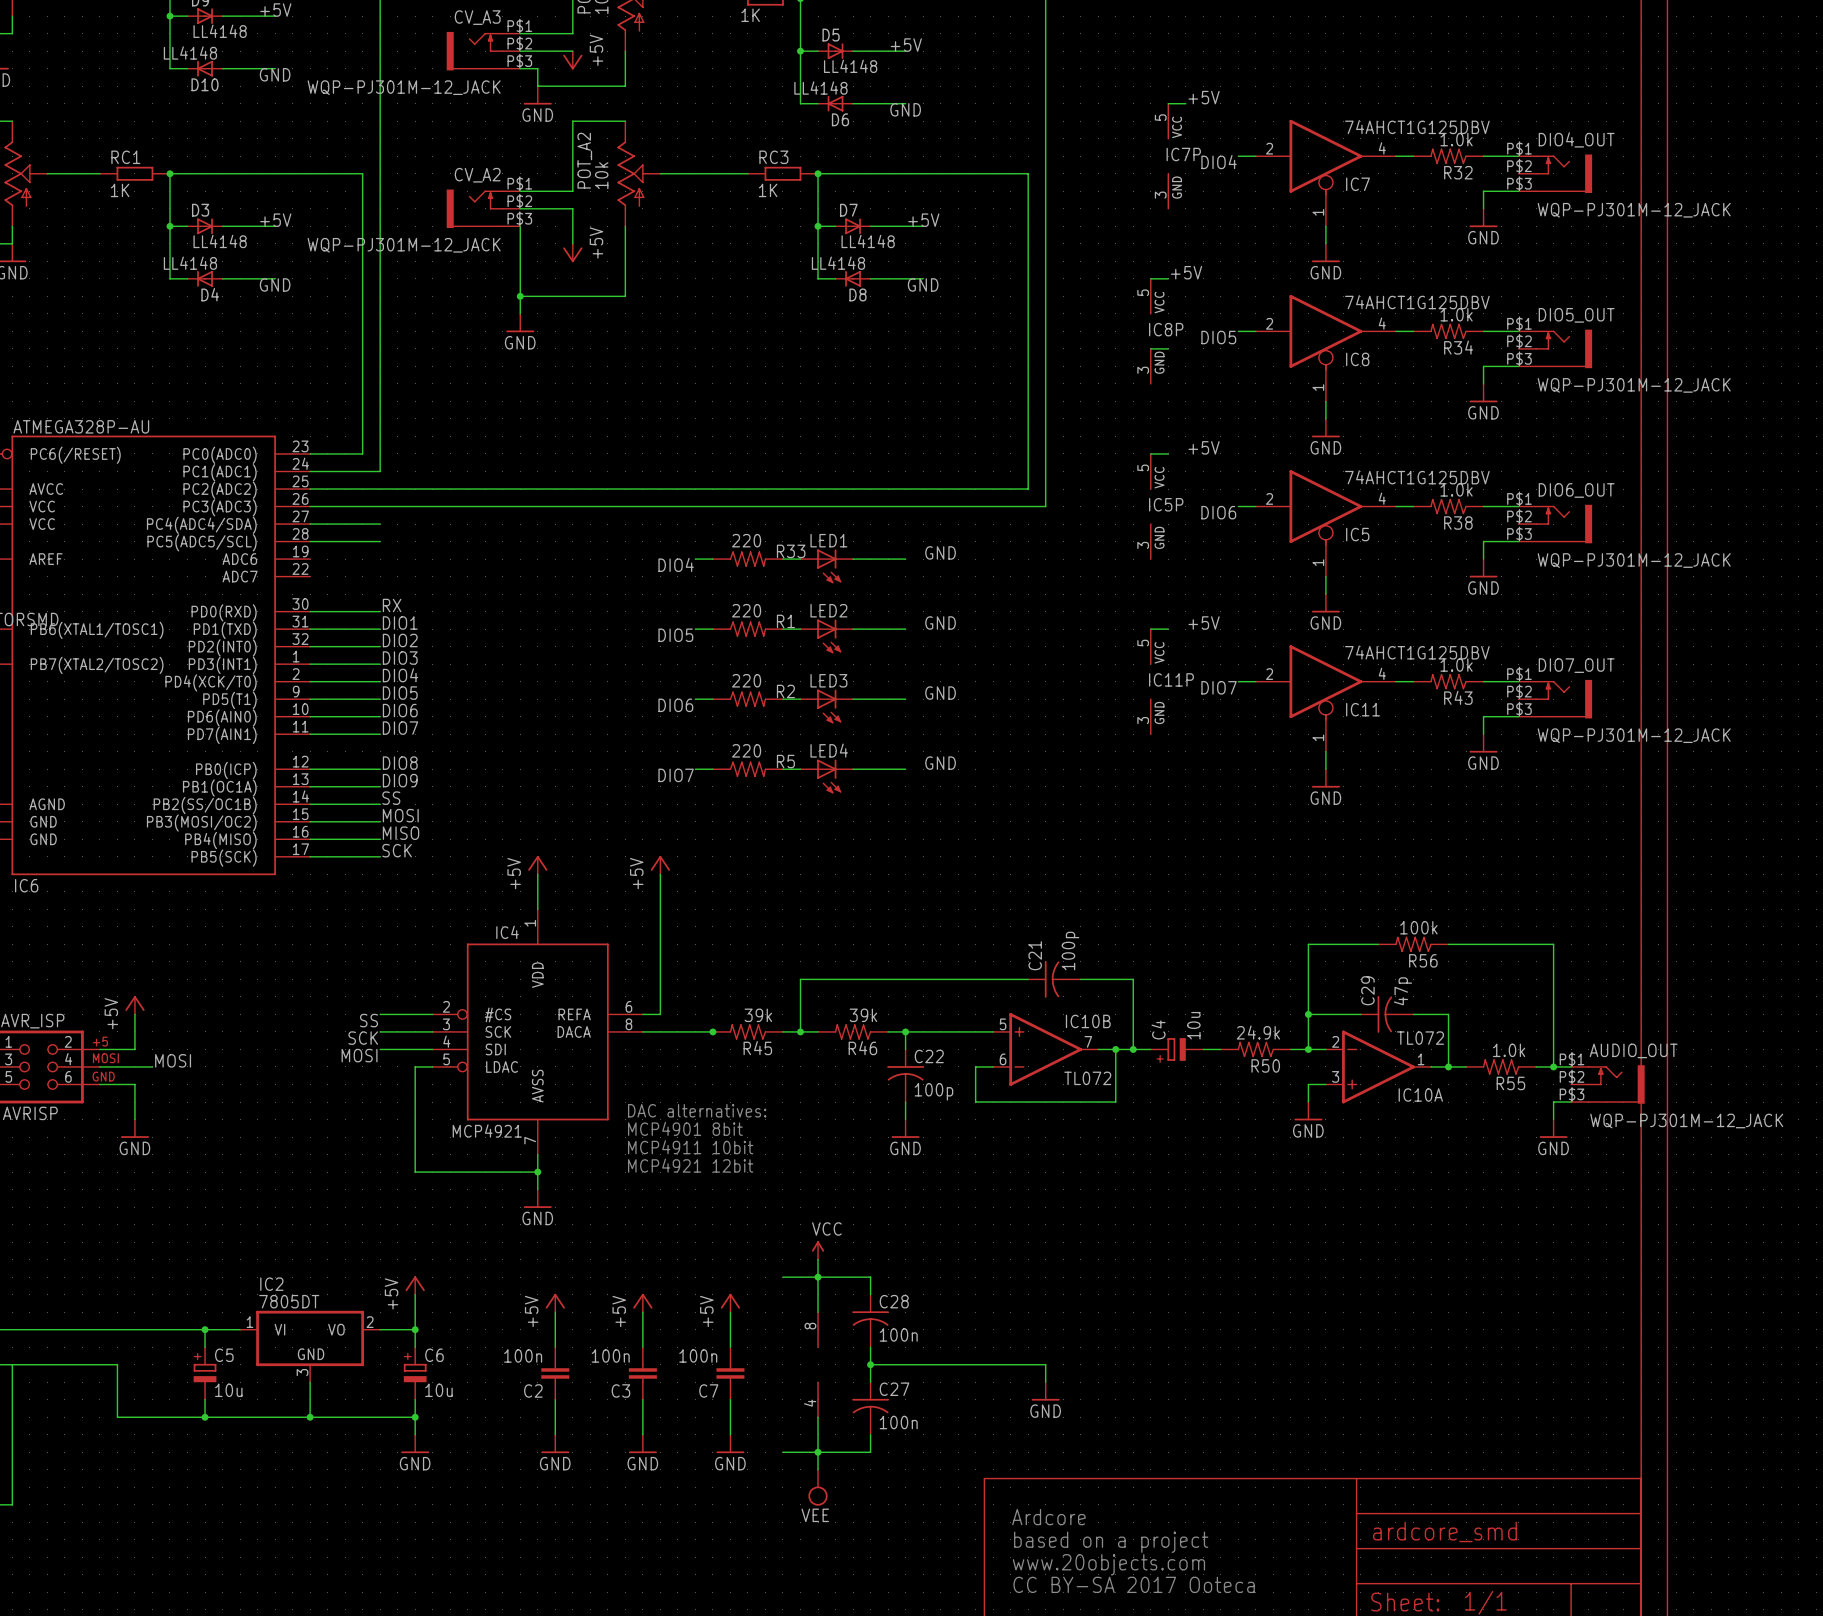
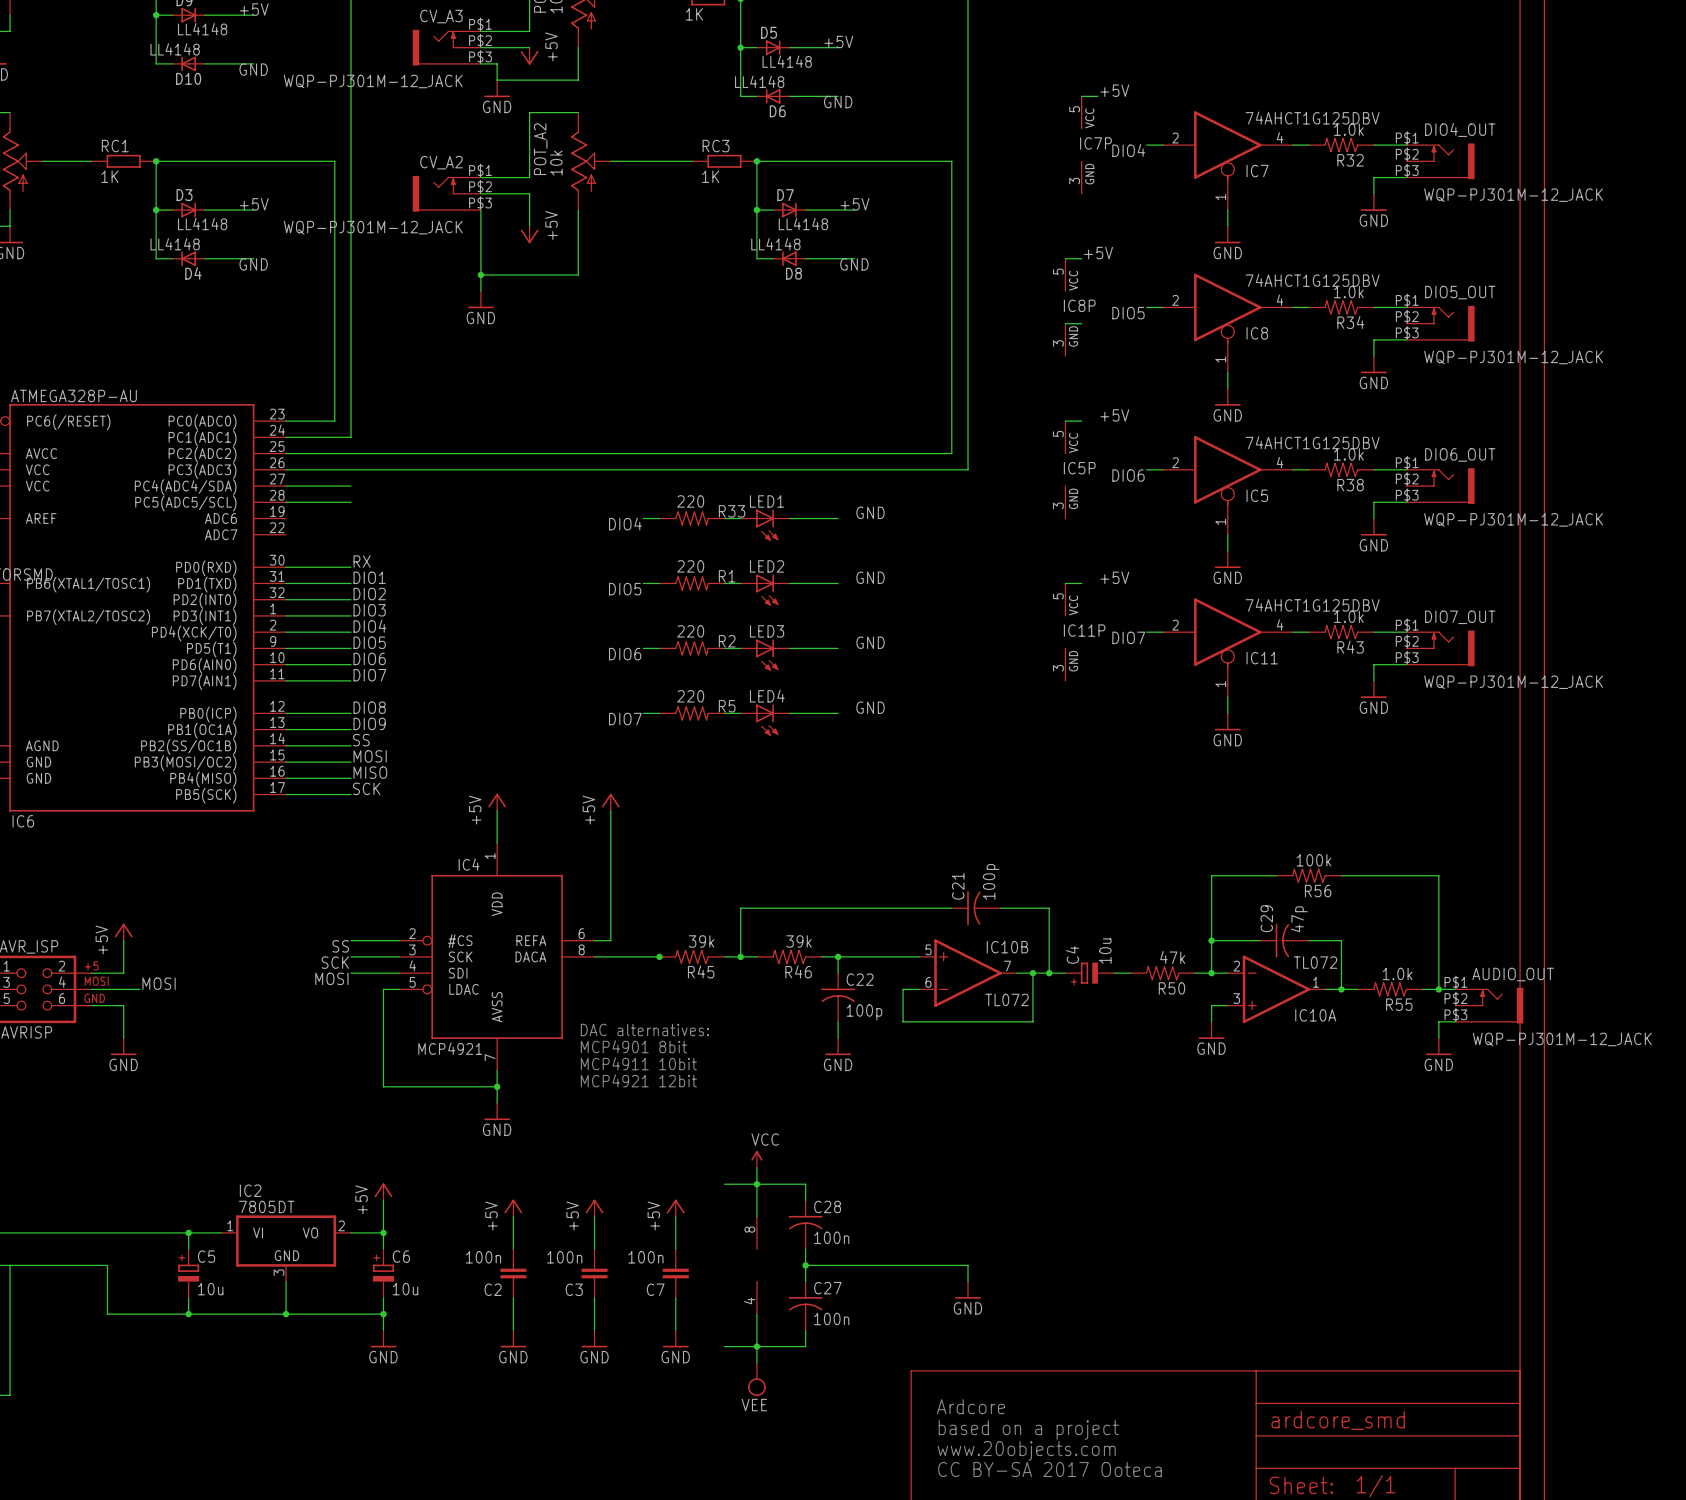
R50 value: 24.9k (1258, 1032) -> 47k (1172, 957)

